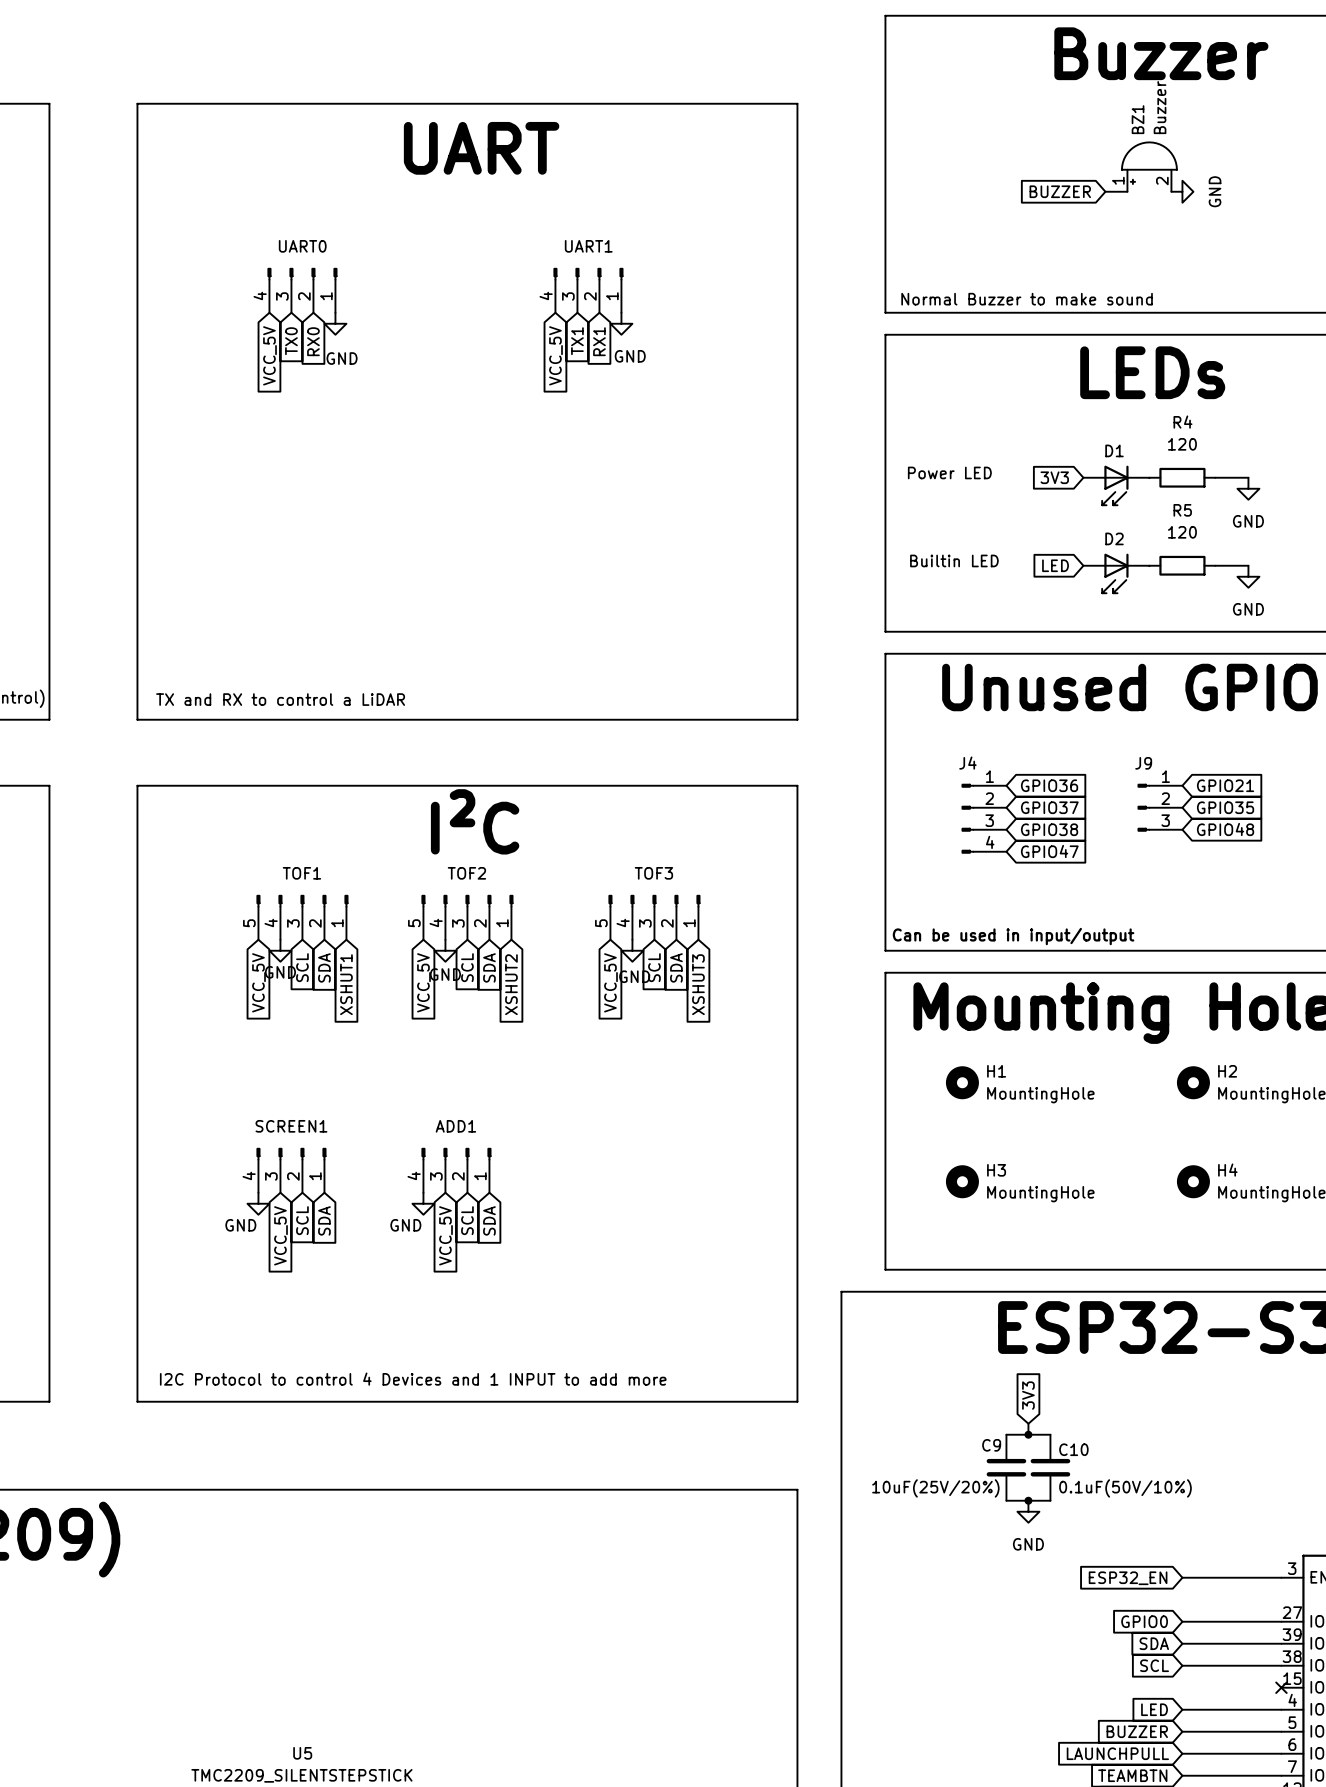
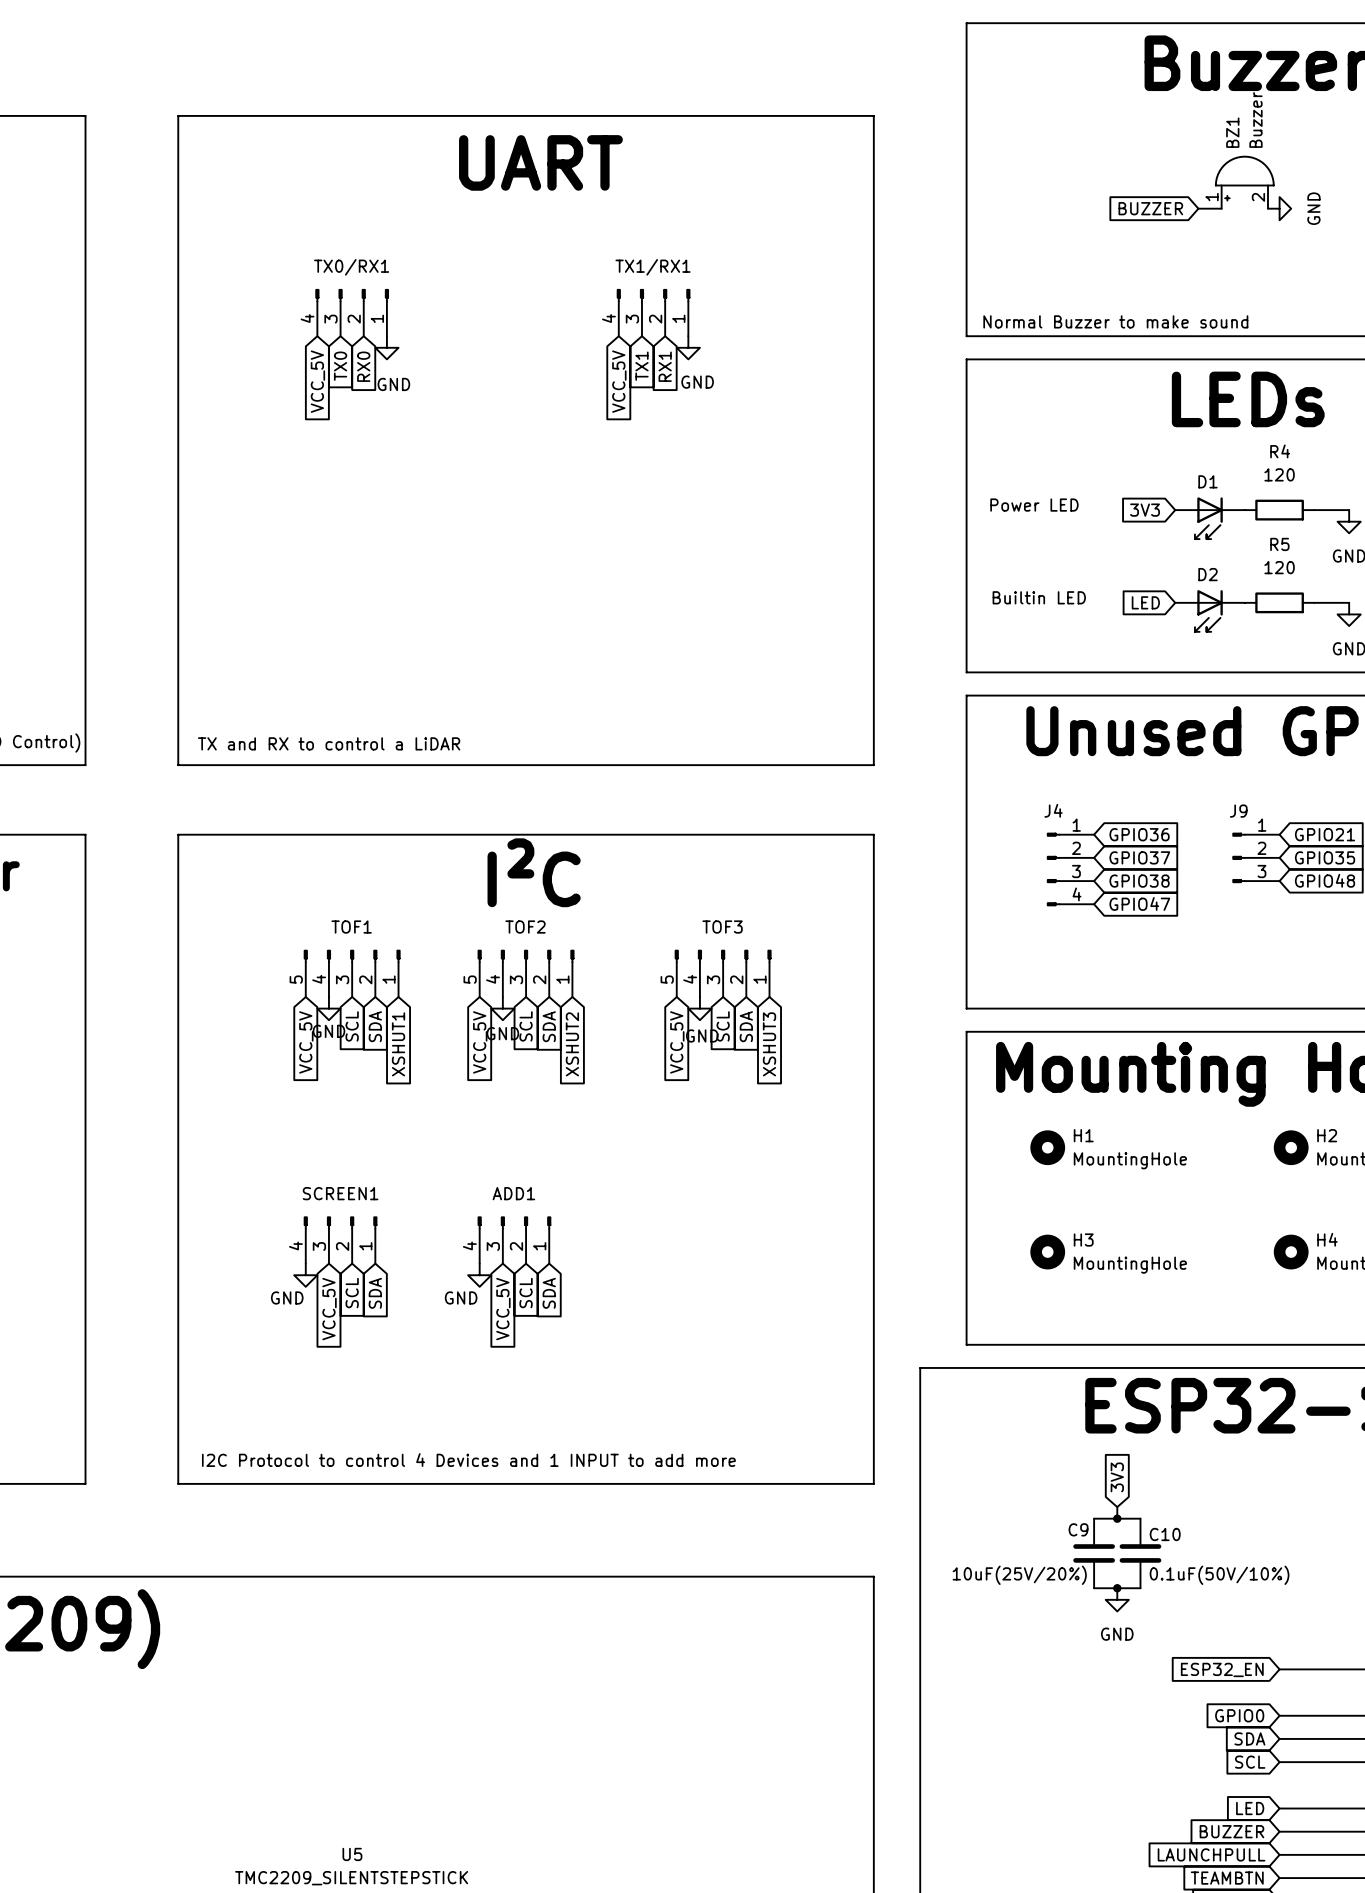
UART0 name: UART0 (302, 246) -> TX0/RX1 (351, 267)
UART1 name: UART1 (588, 246) -> TX1/RX1 (653, 267)
text: Can be used in input/output (1013, 936) -> none

